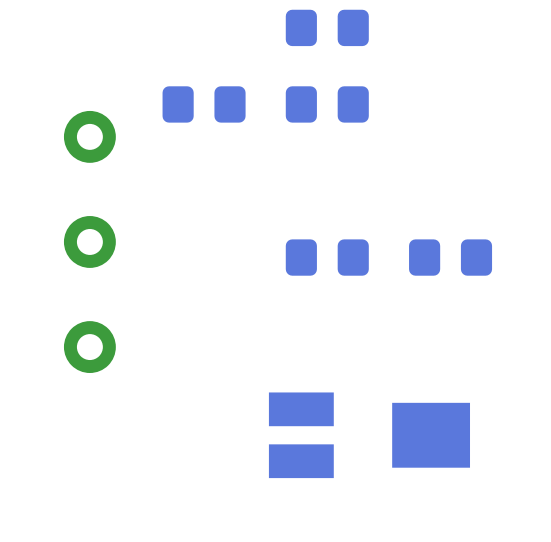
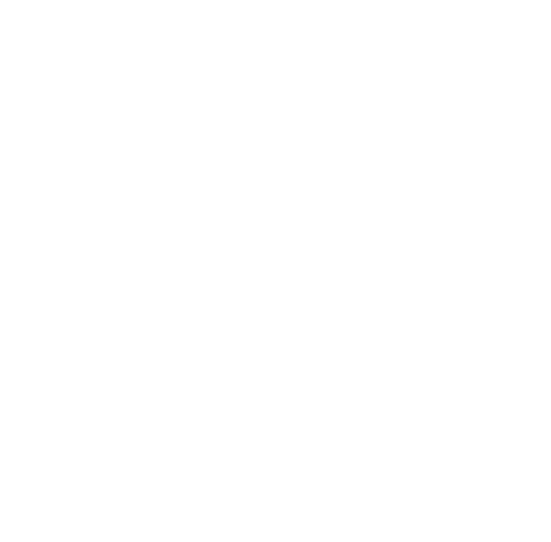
part: (327, 27) -> none
part: (204, 104) -> none
part: (327, 104) -> none
part: (89, 136) -> none
part: (89, 241) -> none
part: (327, 257) -> none
part: (450, 257) -> none
part: (89, 347) -> none
part: (369, 435) -> none

